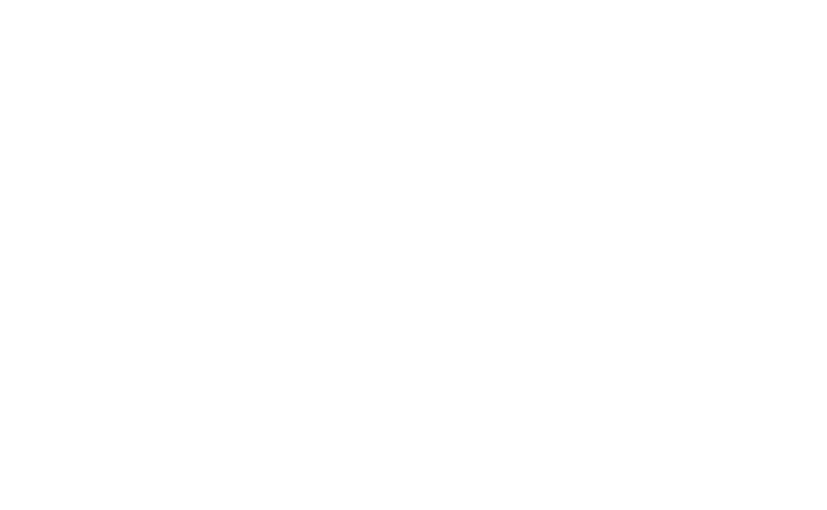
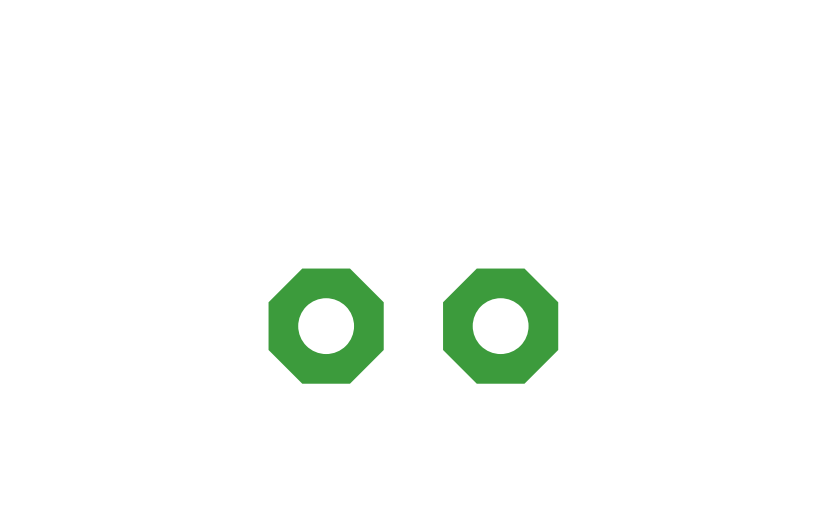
part: none -> (413, 326)

